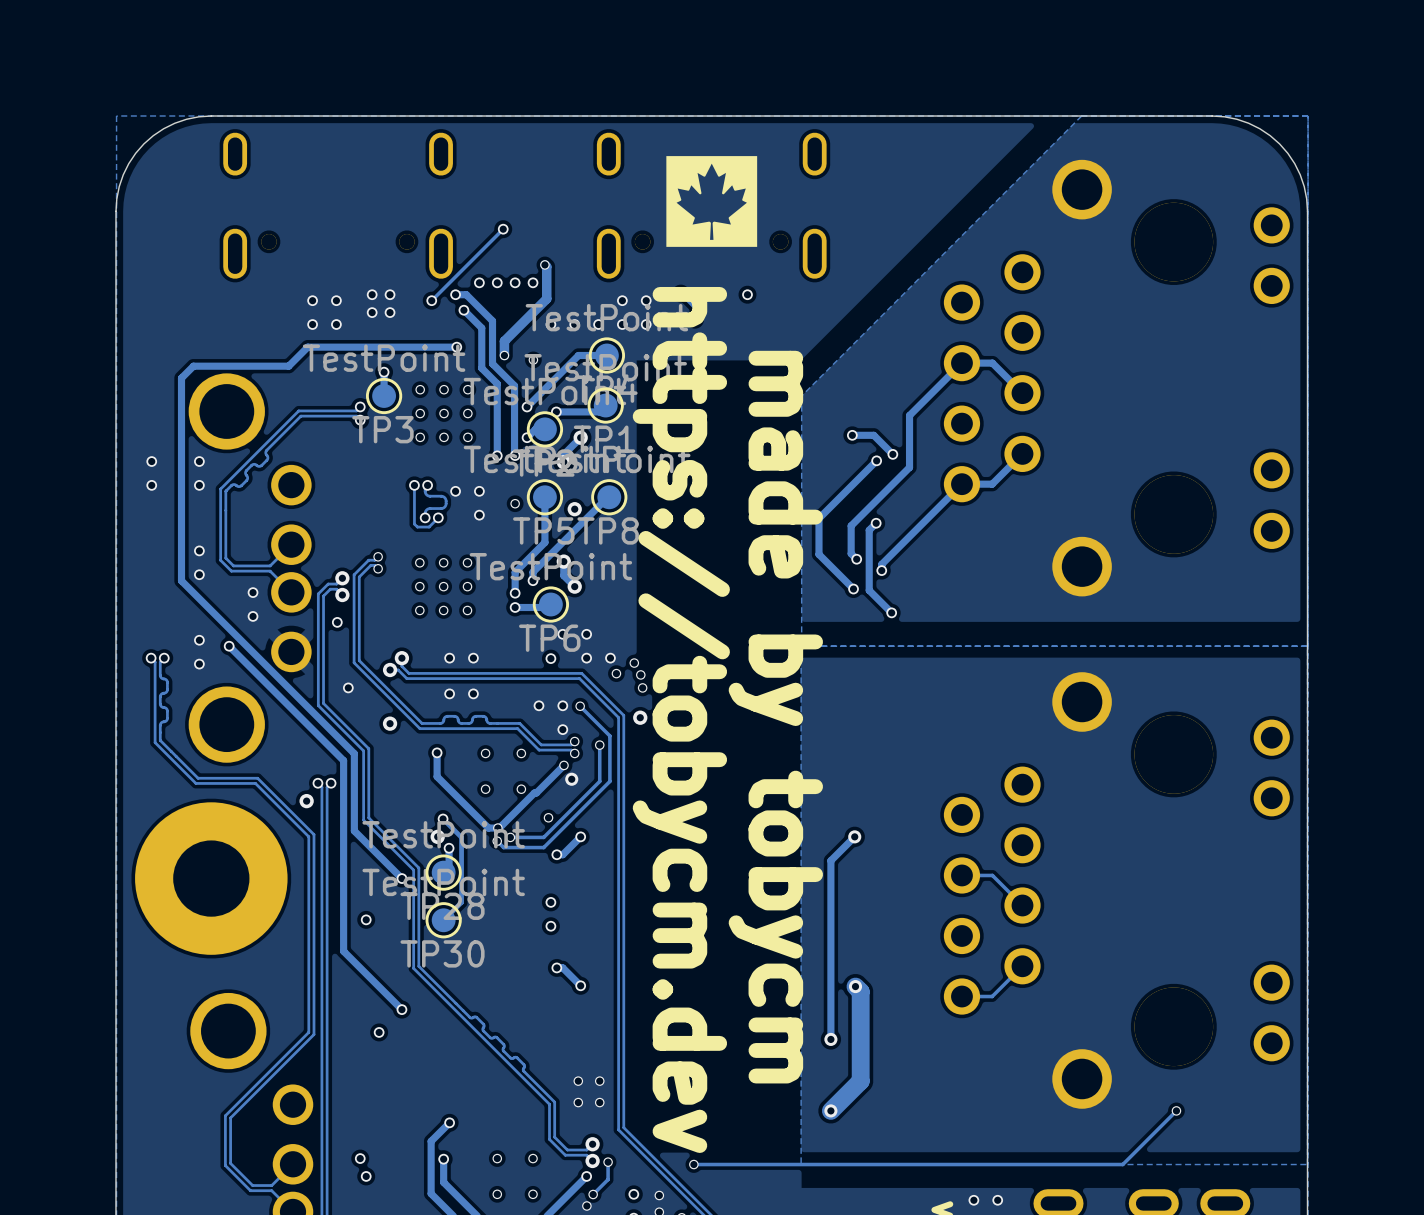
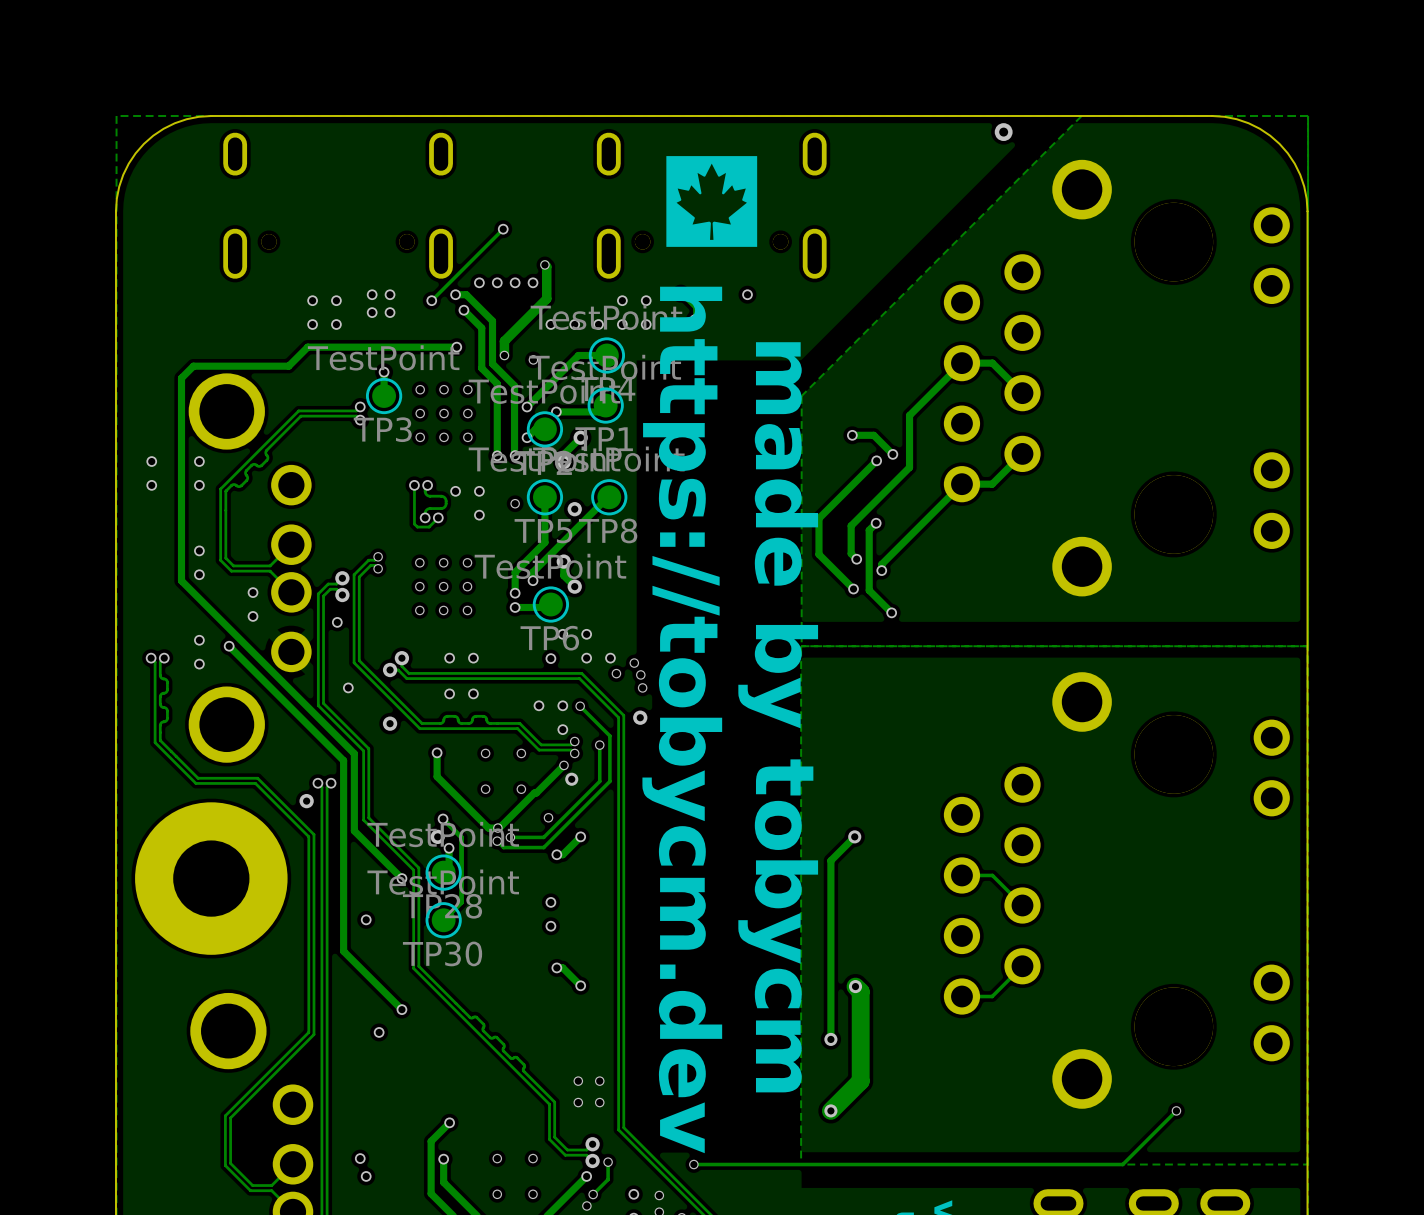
via: none -> (1003, 132)
via: (973, 1200) -> none
via: (997, 1200) -> none

